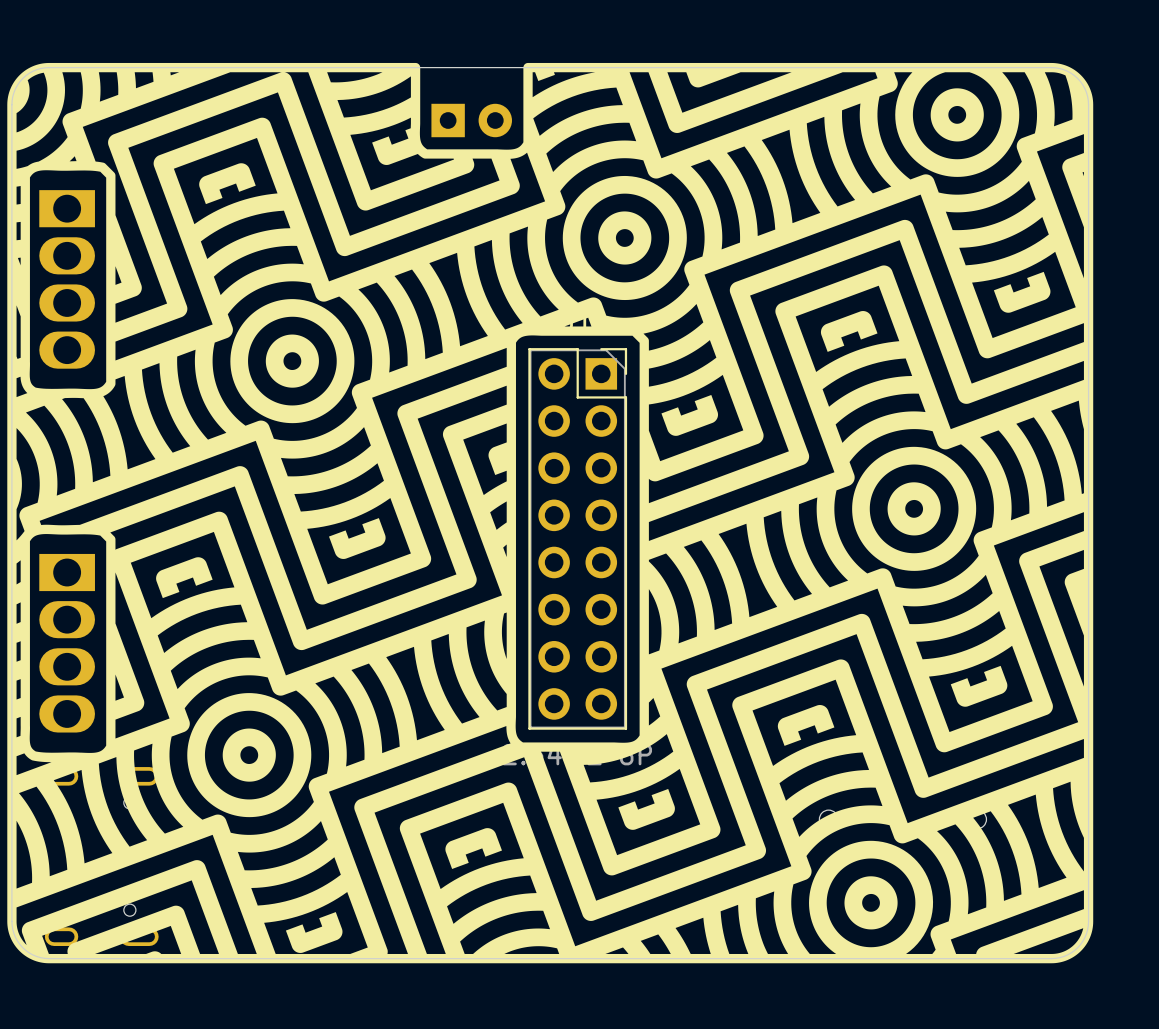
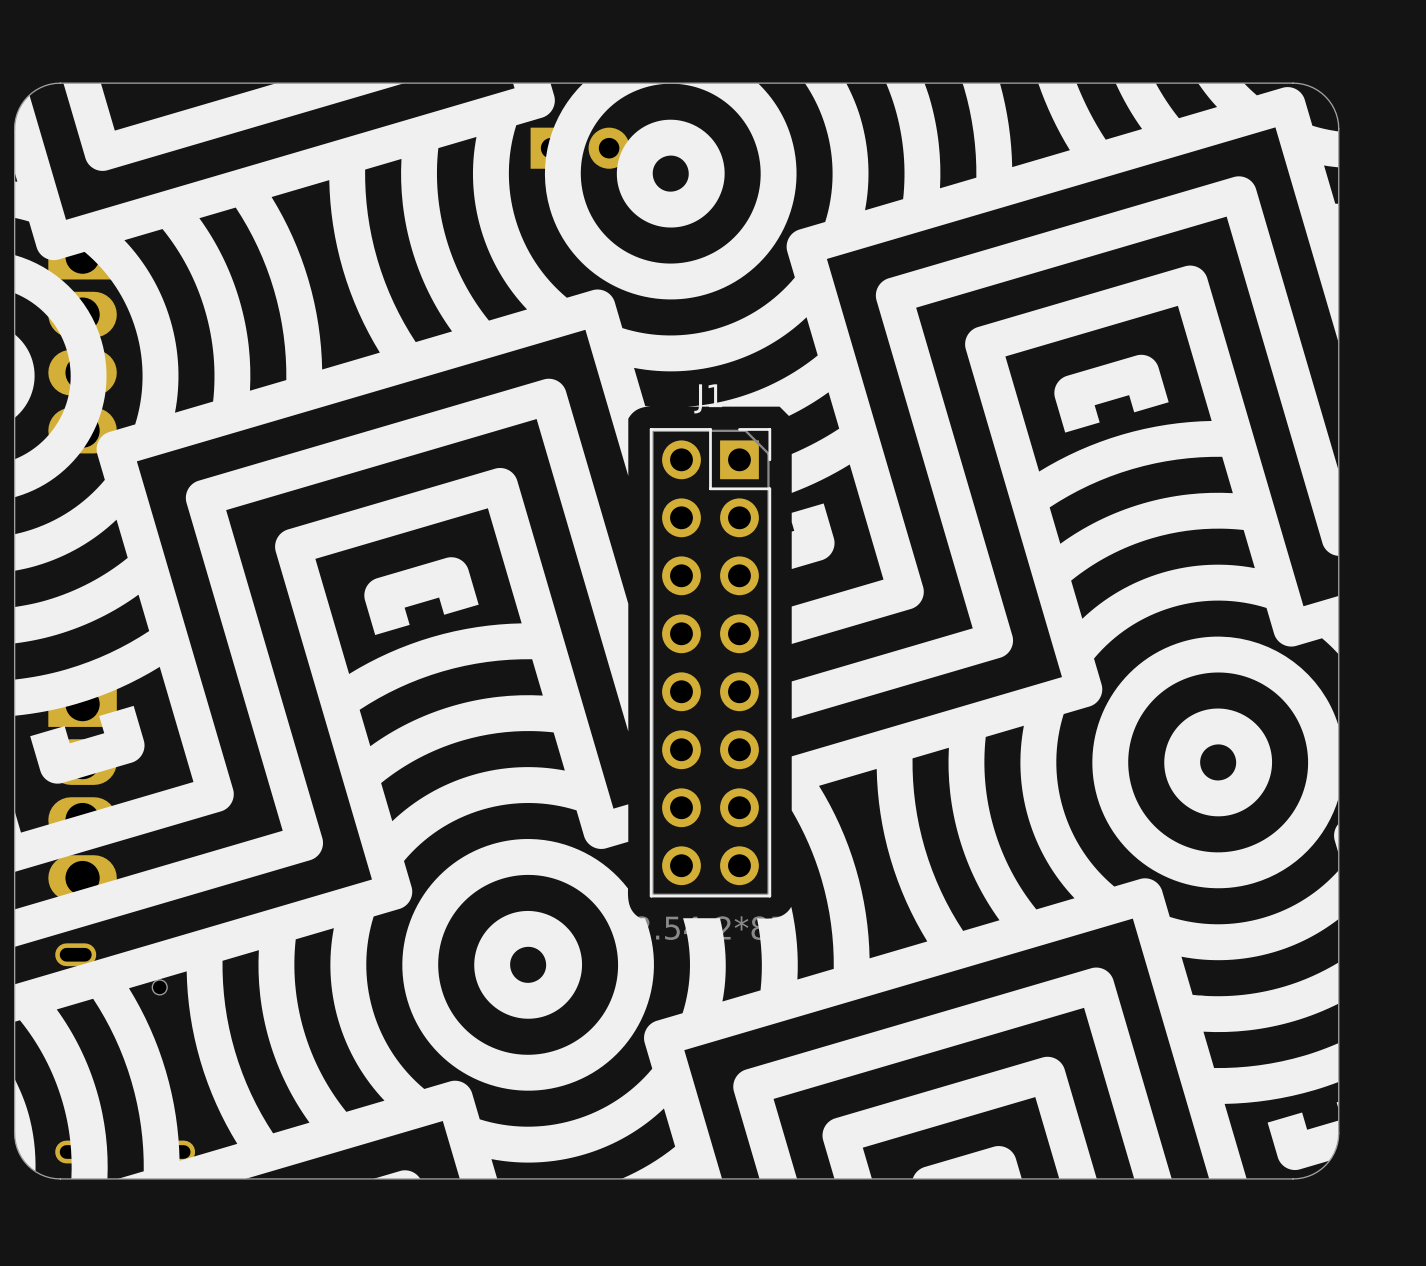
drawing: [7, 62, 1094, 964] -> none
drawing: none -> [14, 83, 1339, 1179]

